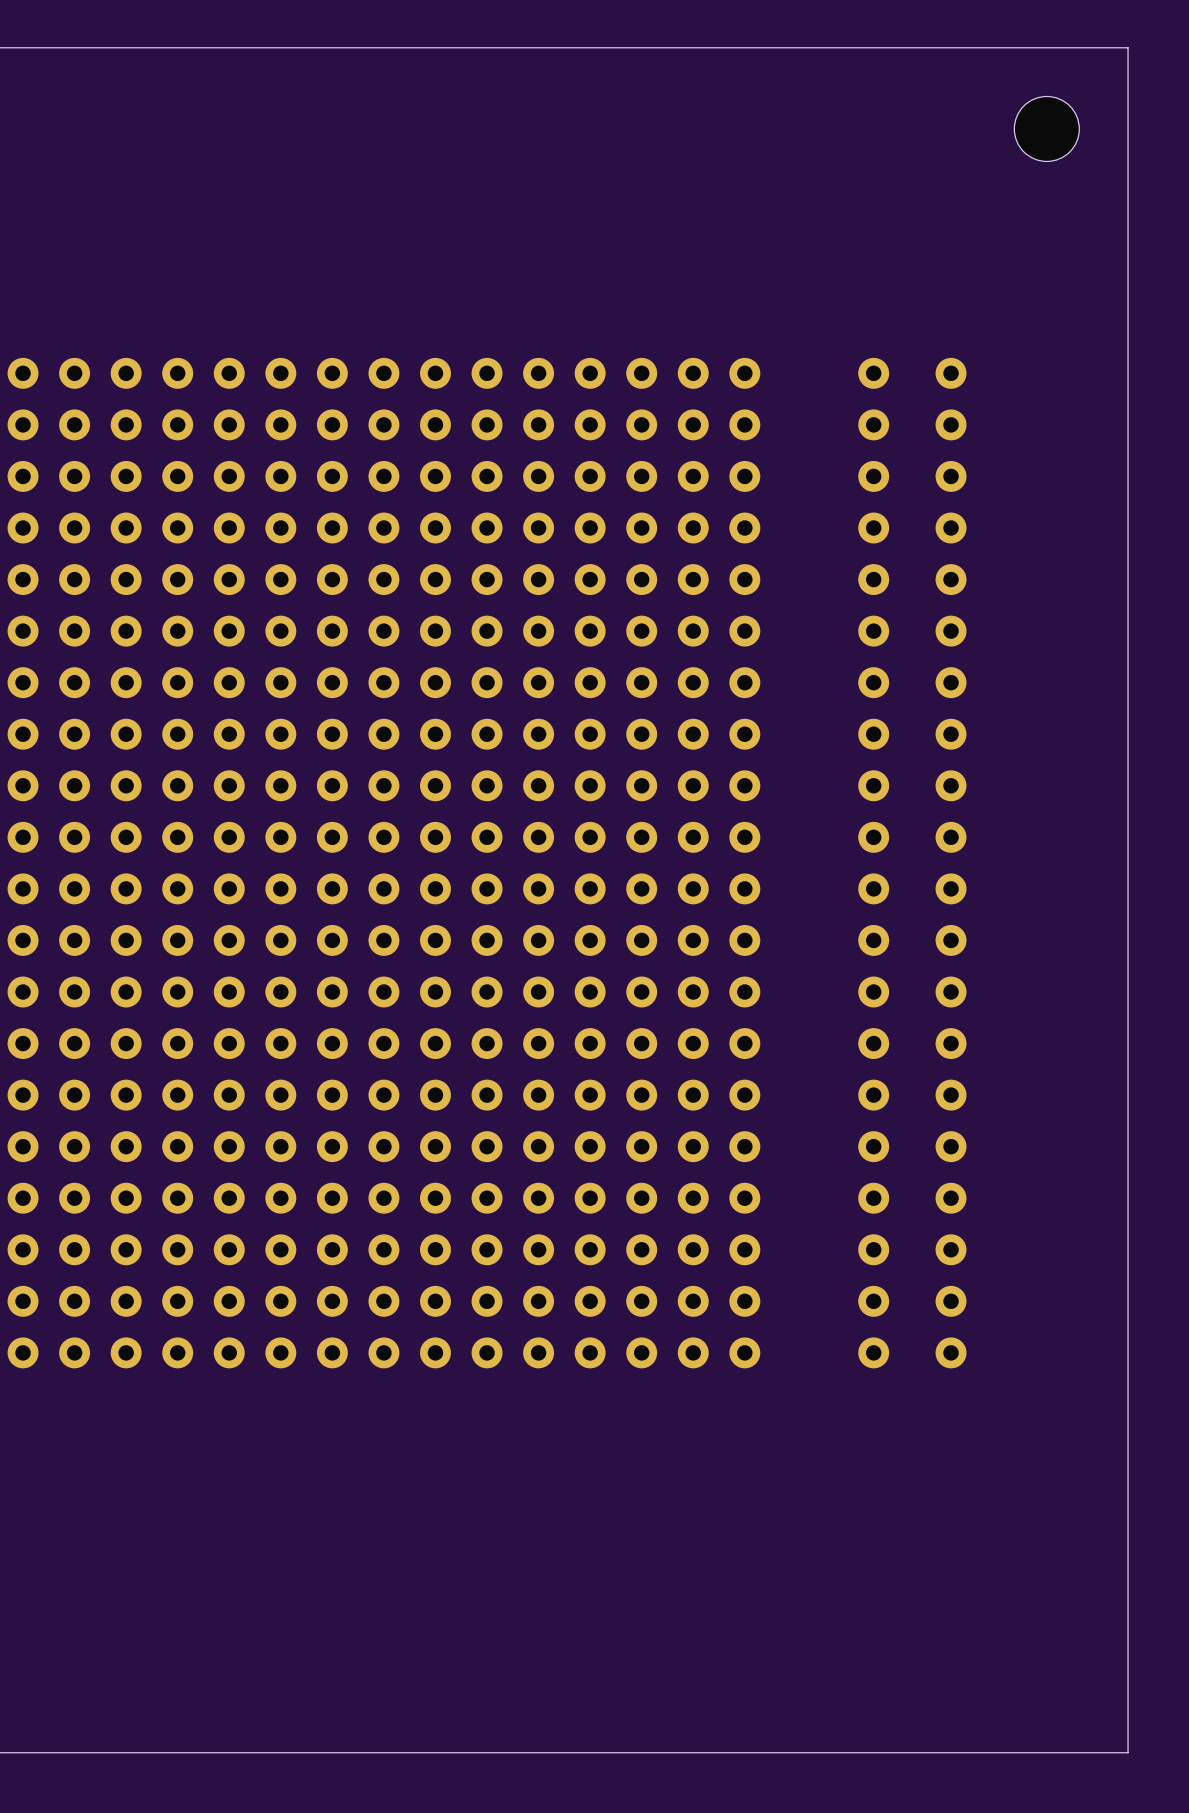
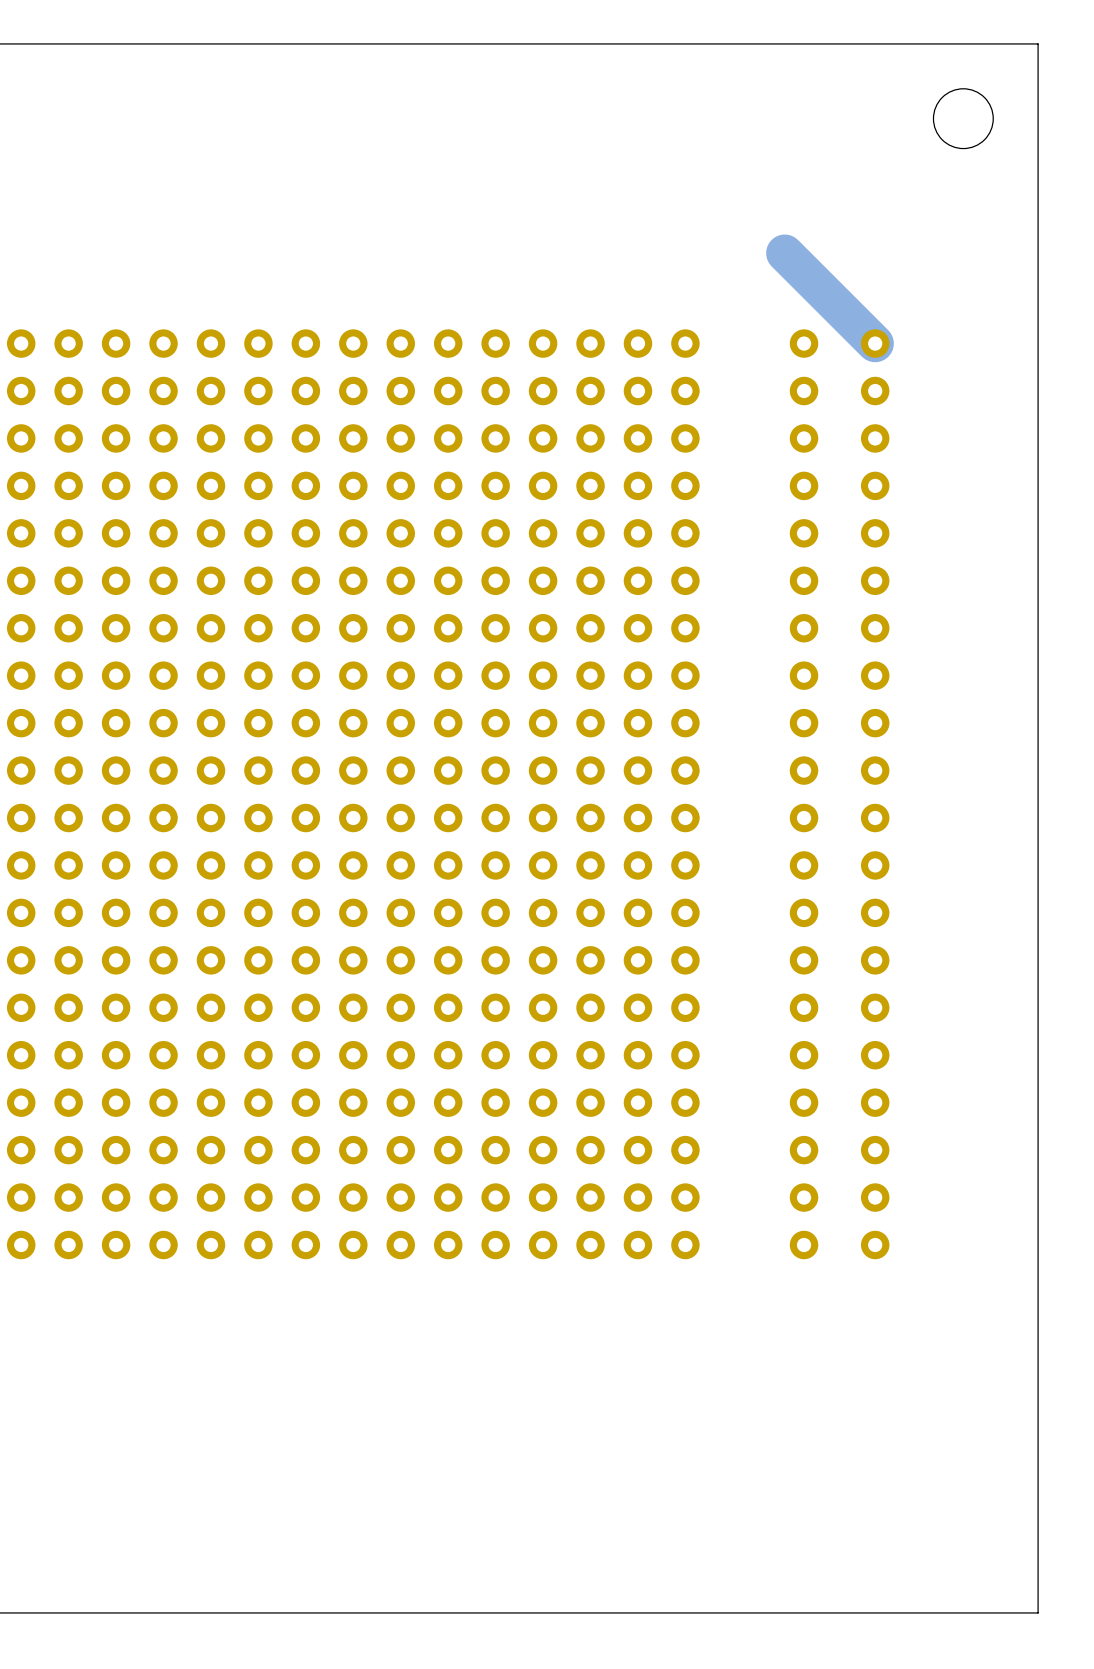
track: none -> (784, 253) (875, 343)

